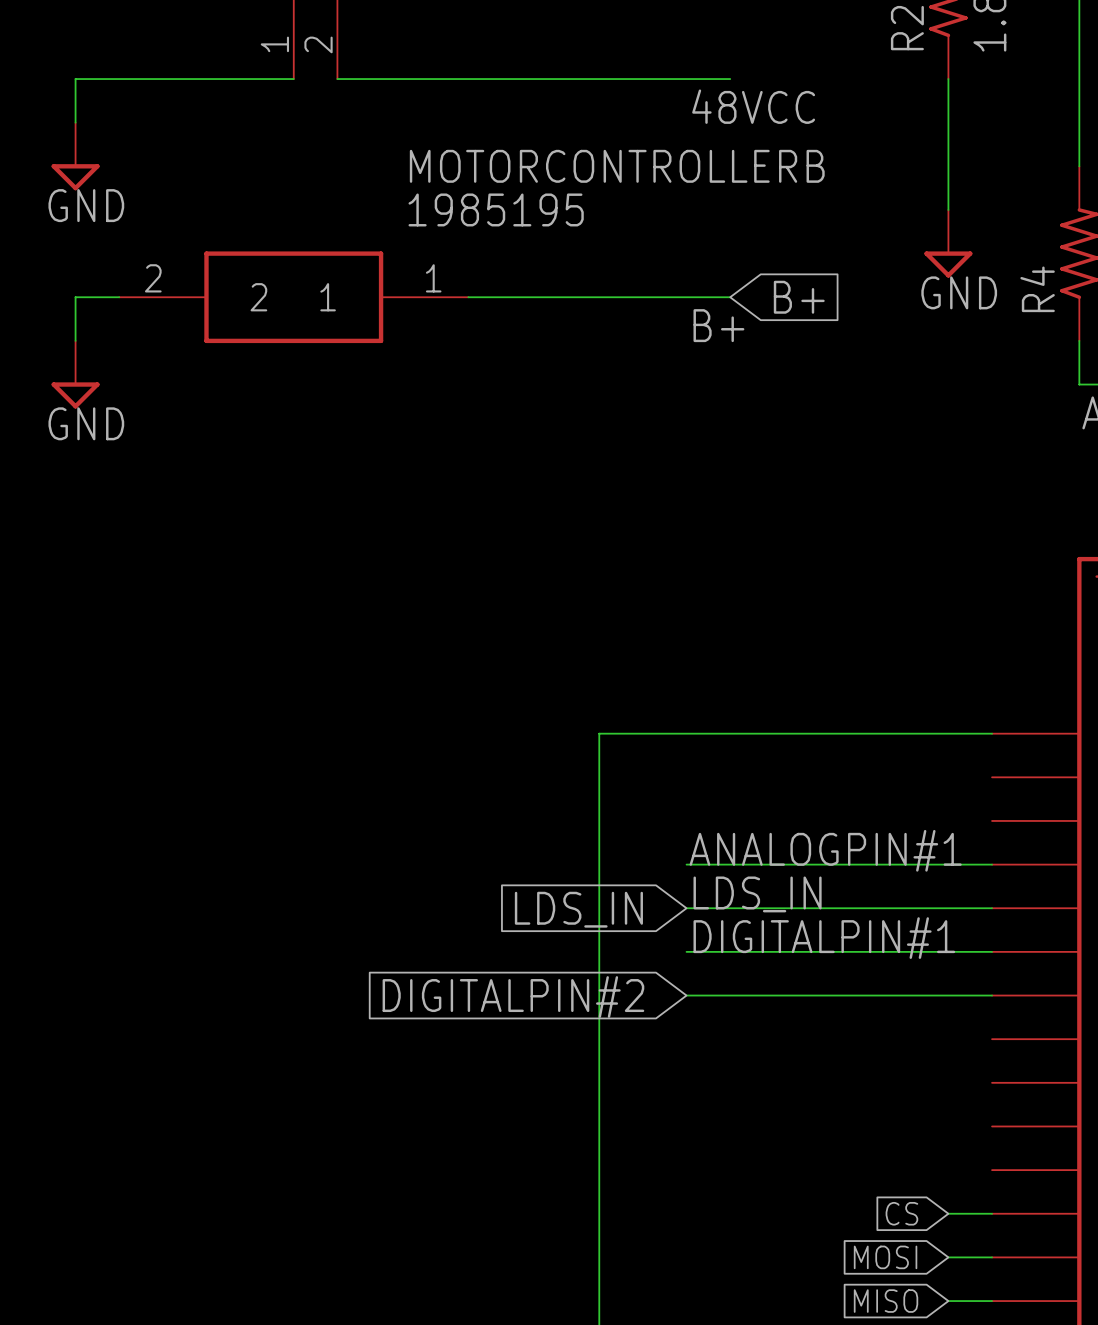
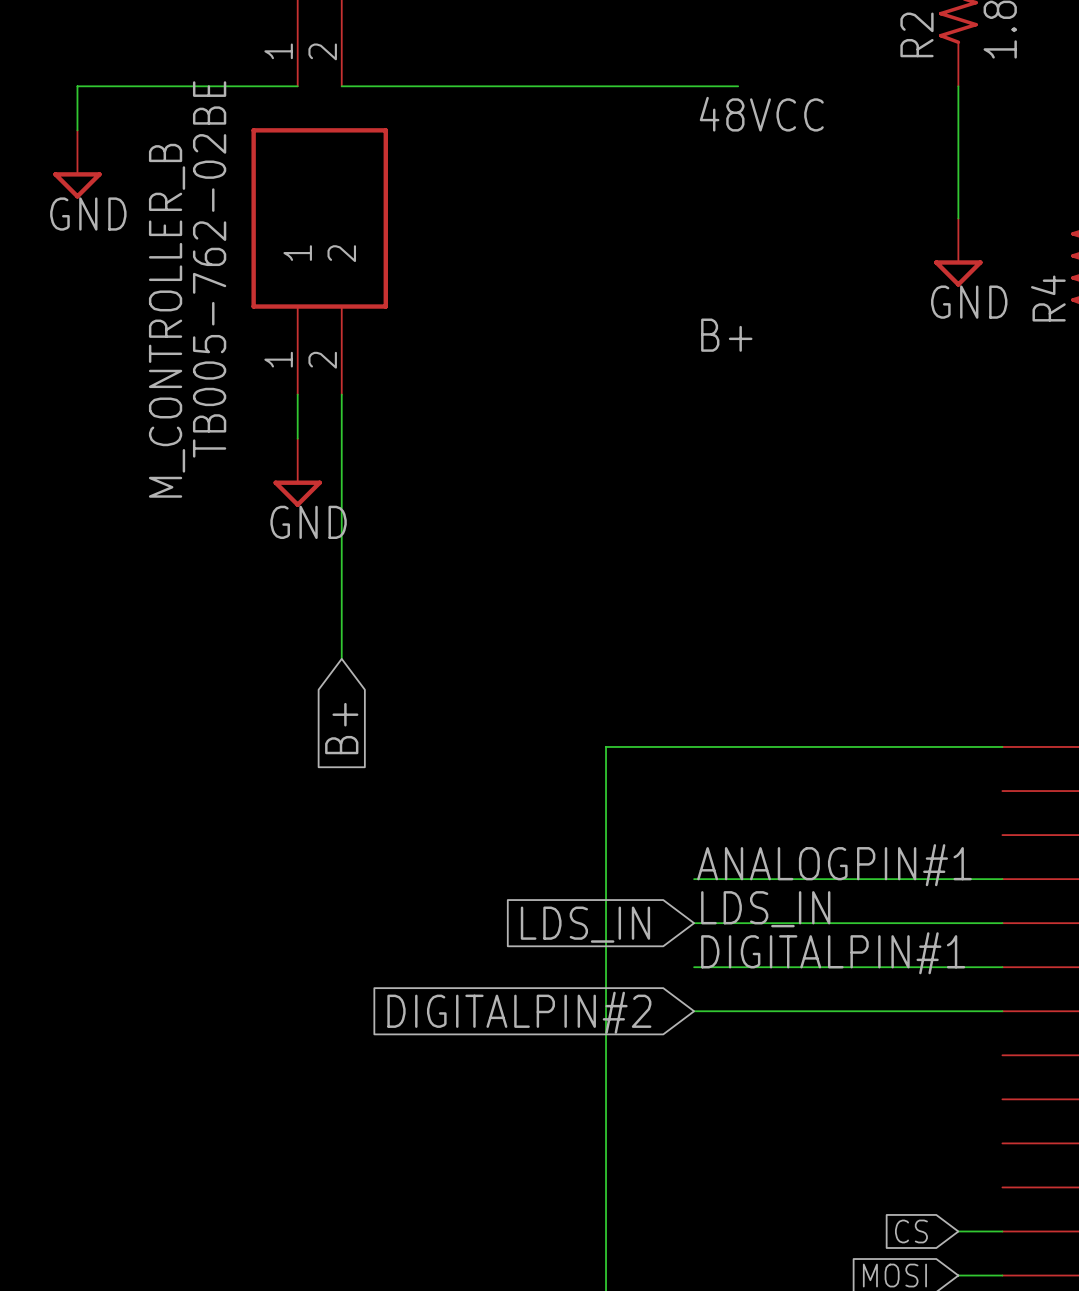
M_CONTROLLER_B: none -> TB005-762-02BE (319, 261)
wire: (119, 297) (75, 297) (75, 340) -> none
MOTORCONTROLLERB: 1985195 (293, 297) -> none
wire: (468, 297) (730, 297) -> none
global label: B+ (799, 297) -> none
power symbol position: GND (75, 374) -> GND (297, 472)
wire: none -> (297, 394) (297, 438)
wire: none -> (341, 394) (341, 658)
global label: none -> B+ (341, 728)

